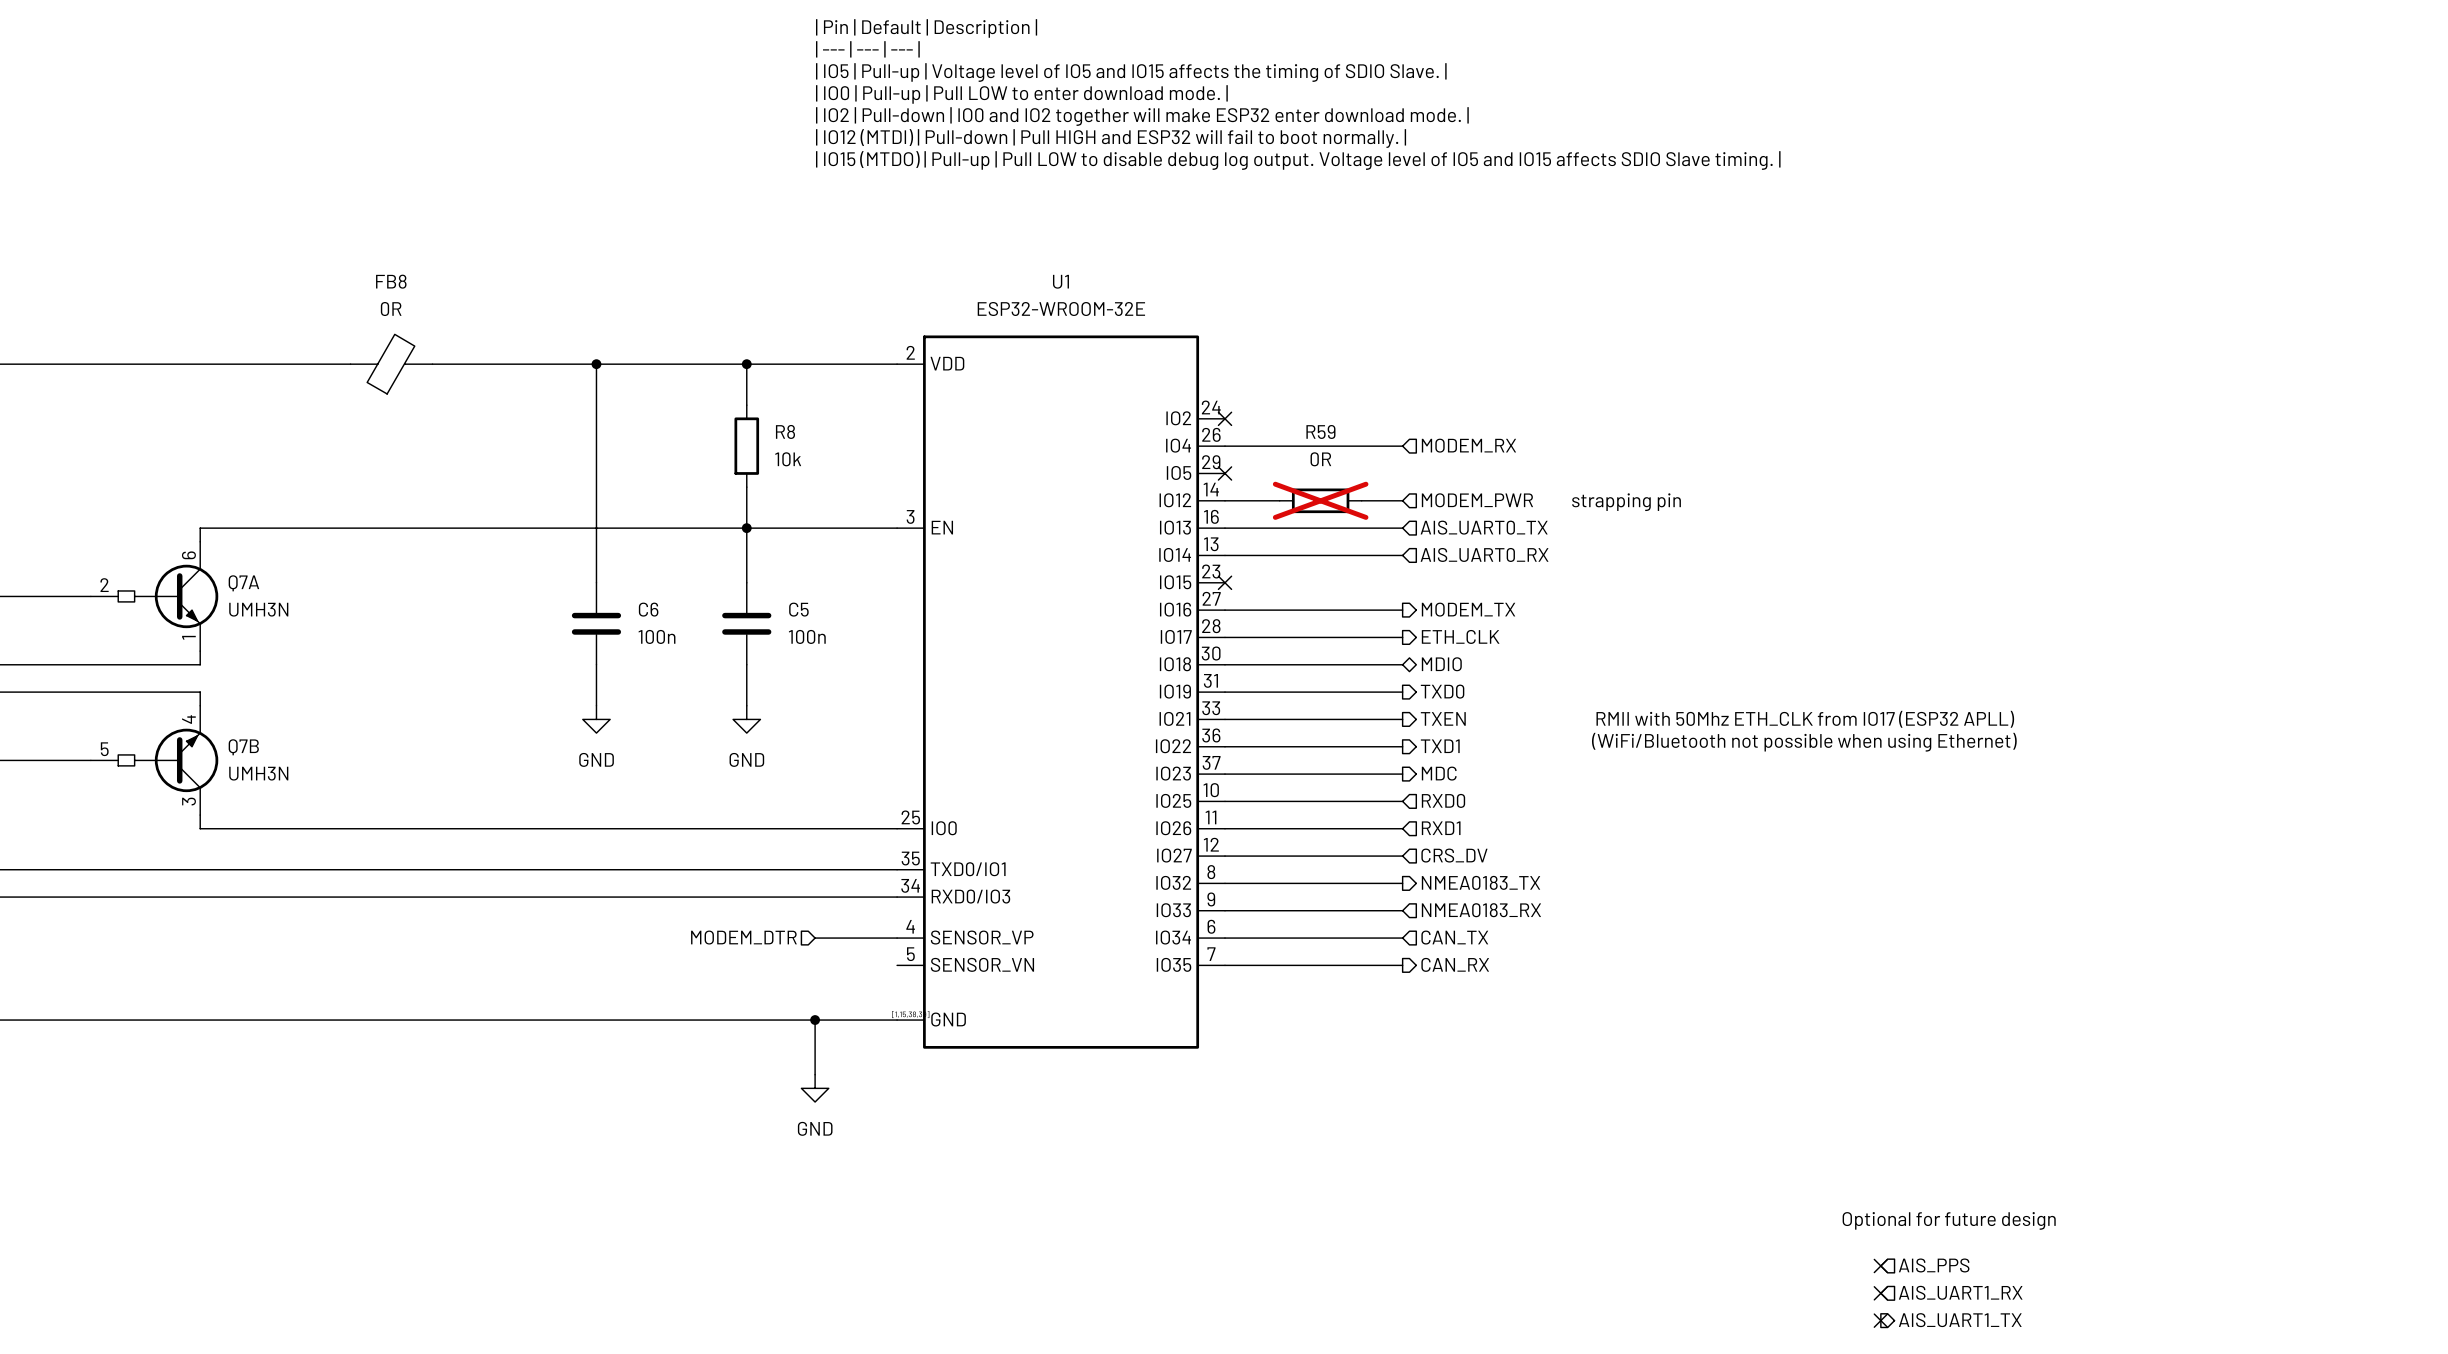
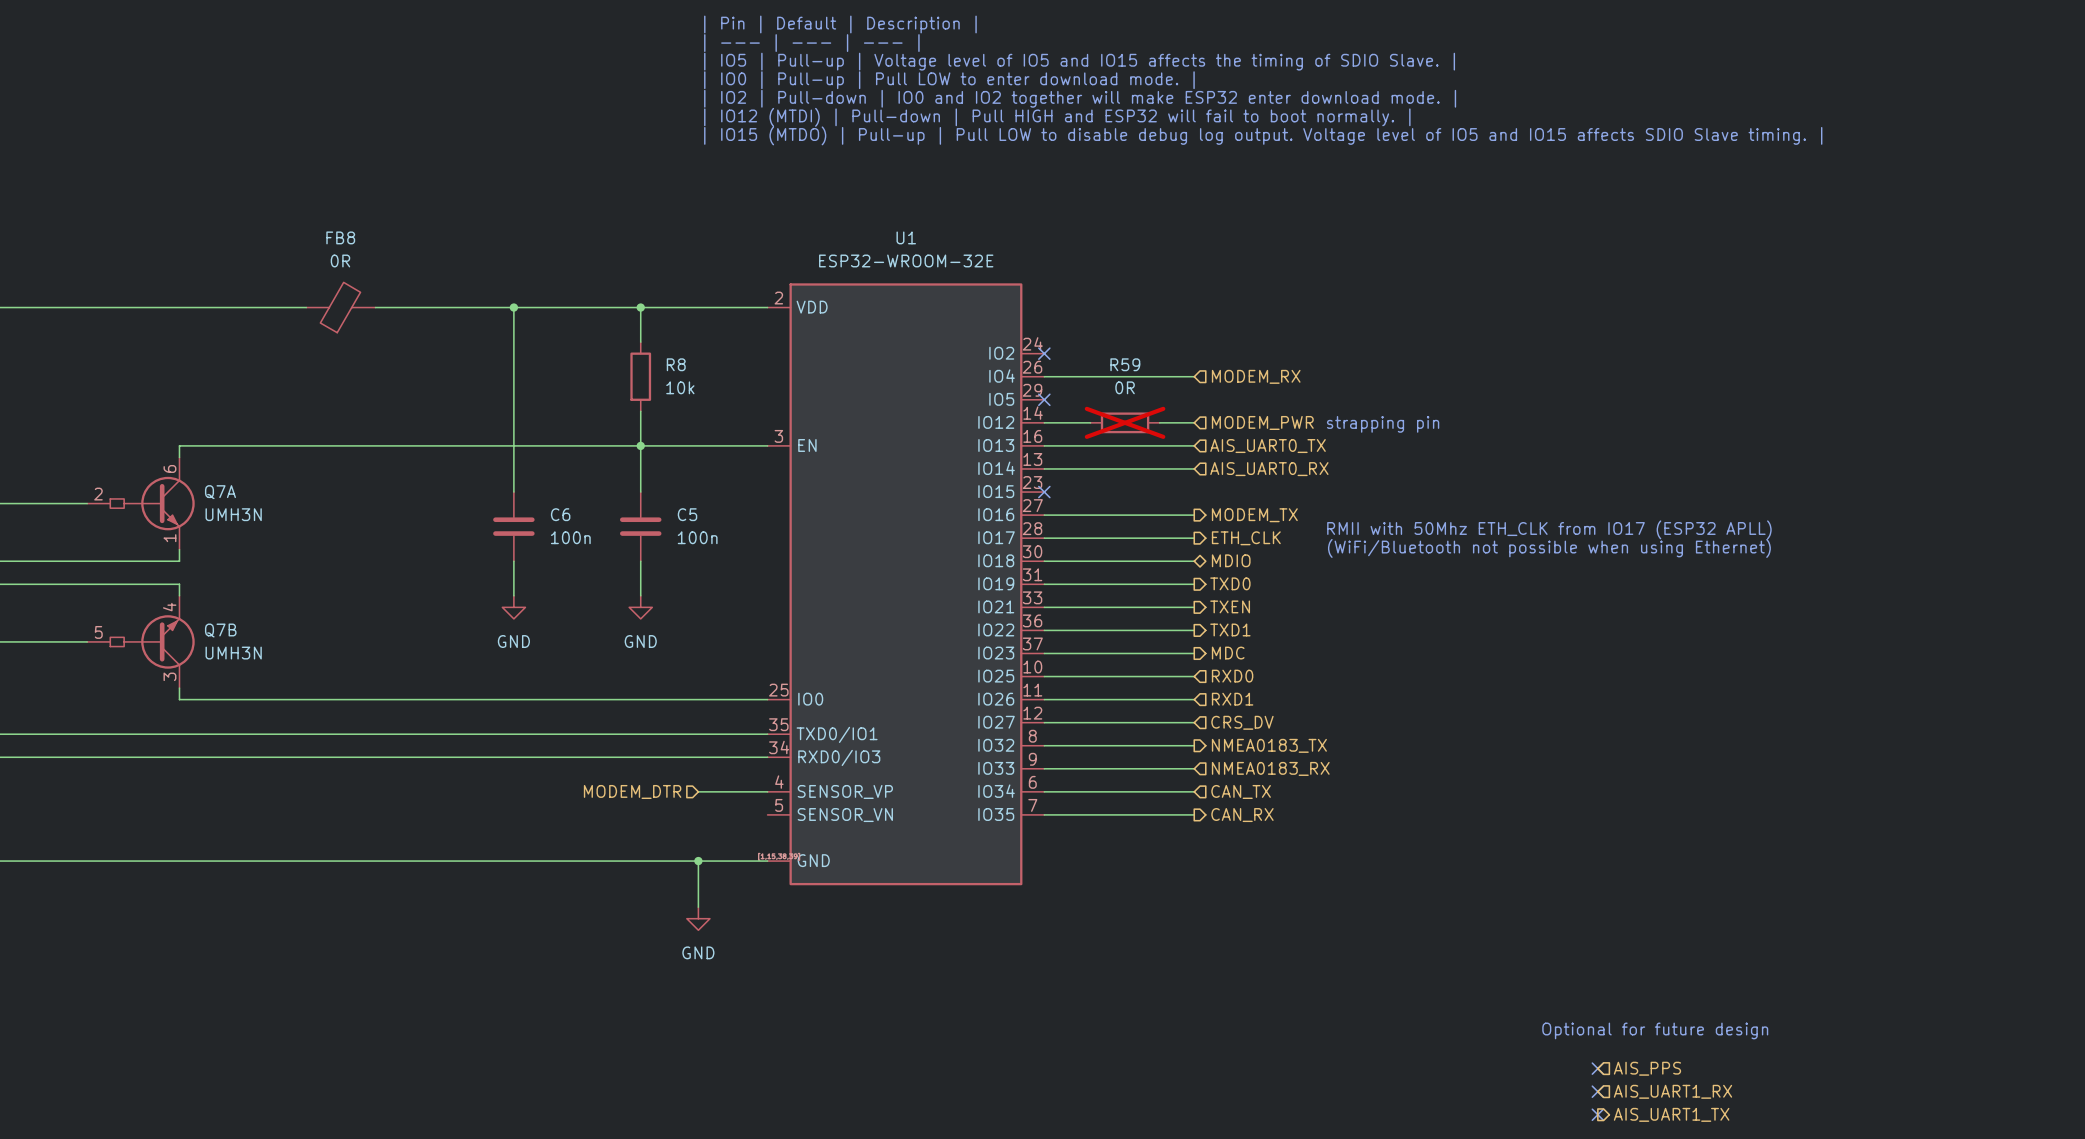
text position: RMII with 50Mhz ETH_CLK from IO17 (ESP32 APLL) (1805, 719) -> RMII with 50Mhz ETH_CLK from IO17 (ESP32 APLL) (1549, 529)
text position: (WiFi/Bluetooth not possible when using Ethernet) (1804, 742) -> (WiFi/Bluetooth not possible when using Ethernet) (1549, 548)

